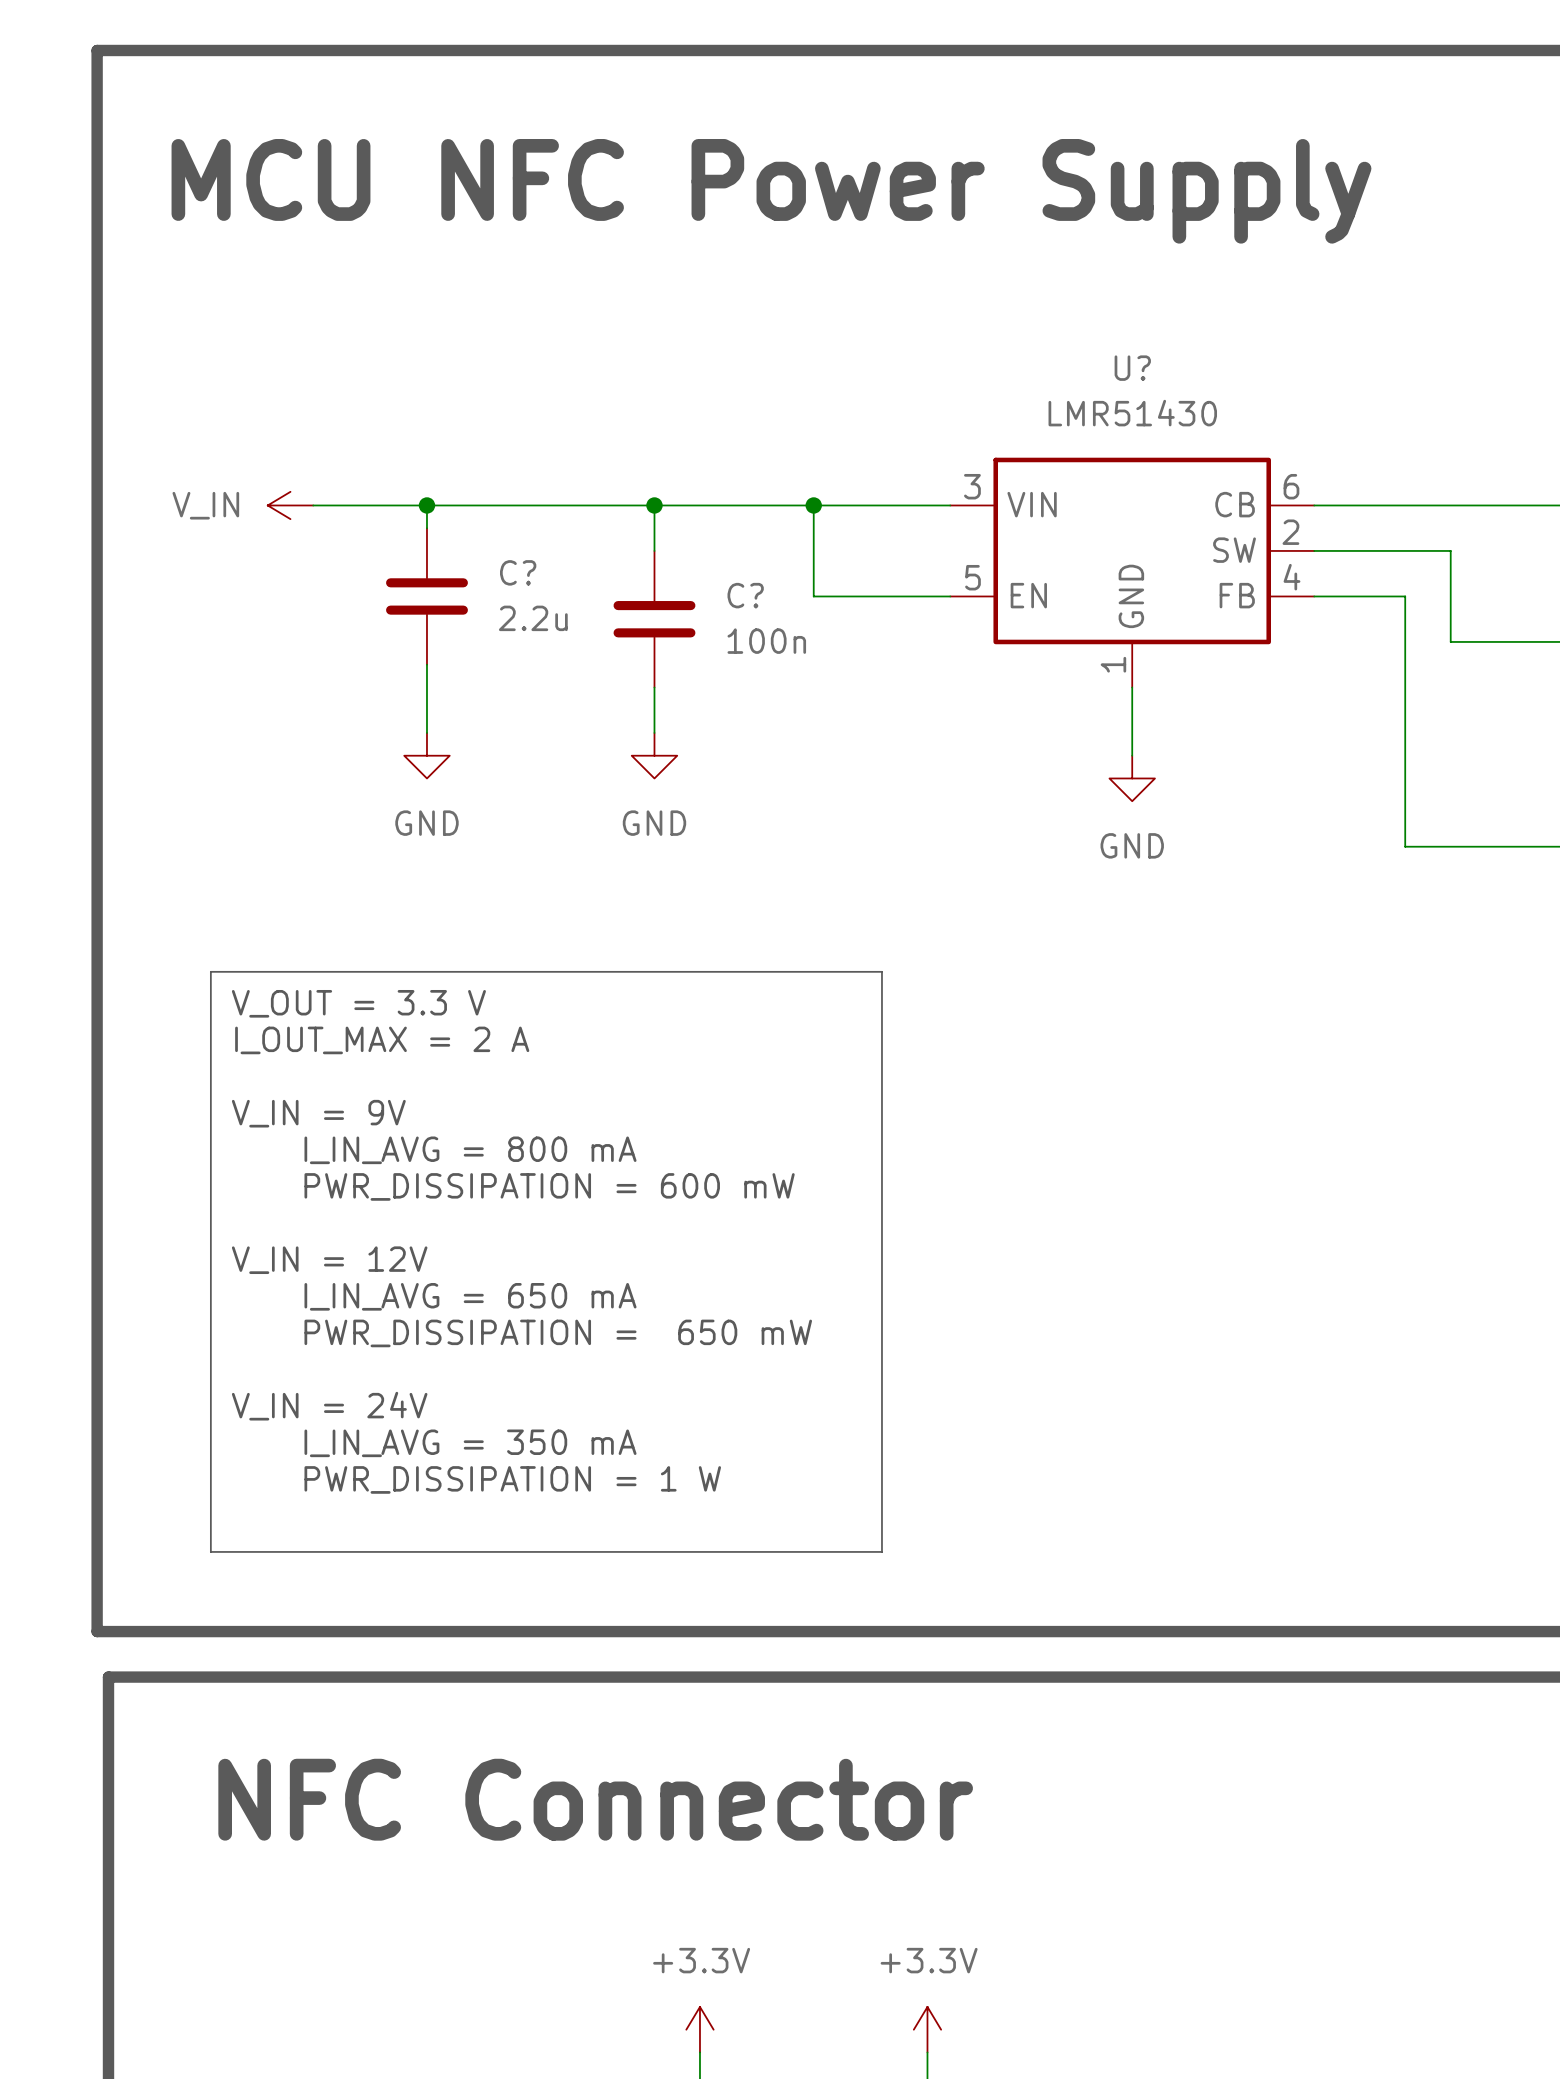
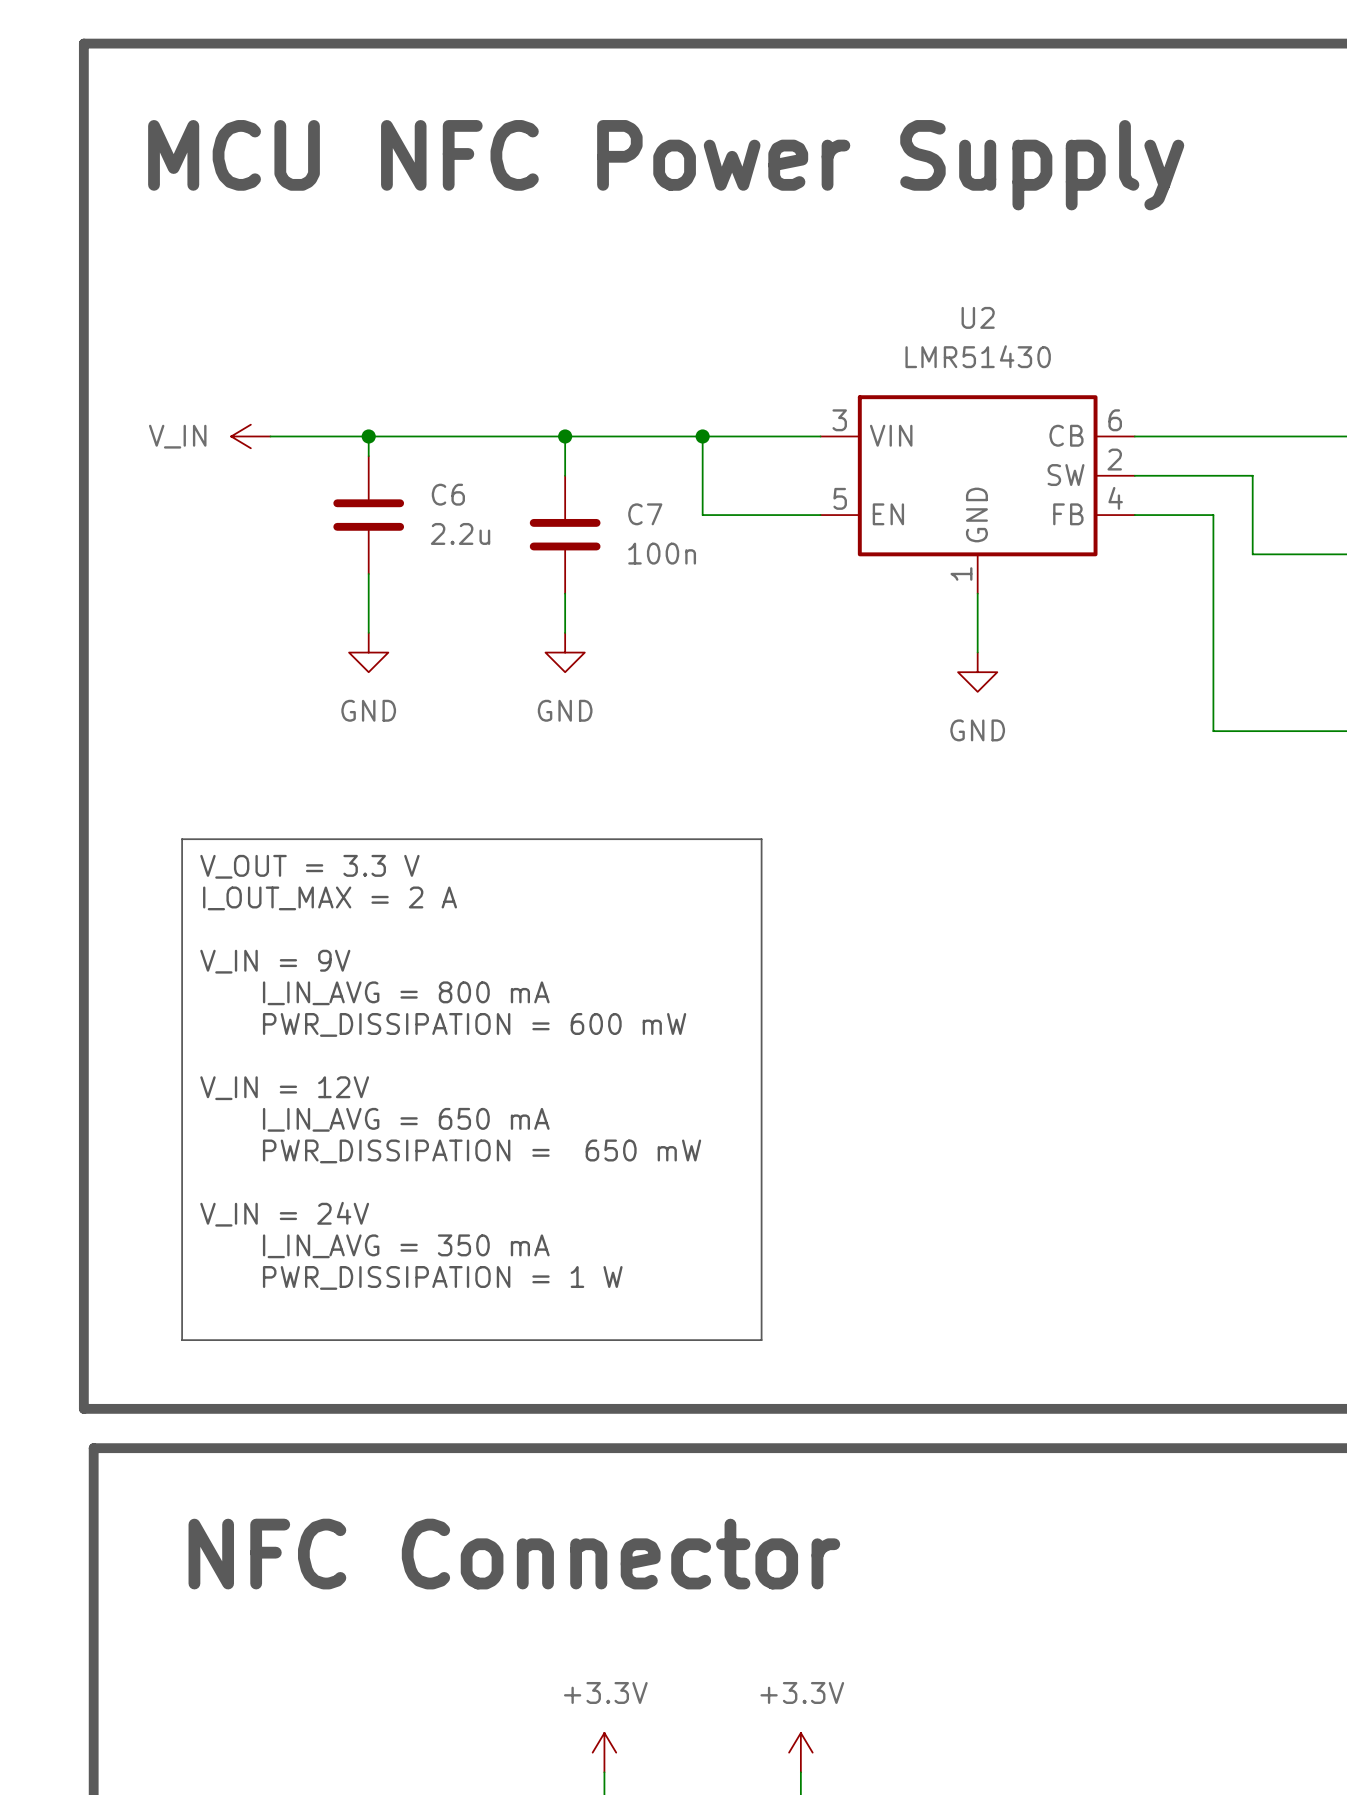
U? name: U? (1132, 368) -> U2 (978, 317)
C? name: C? (518, 572) -> C6 (448, 494)
C? name: C? (745, 595) -> C7 (645, 514)

